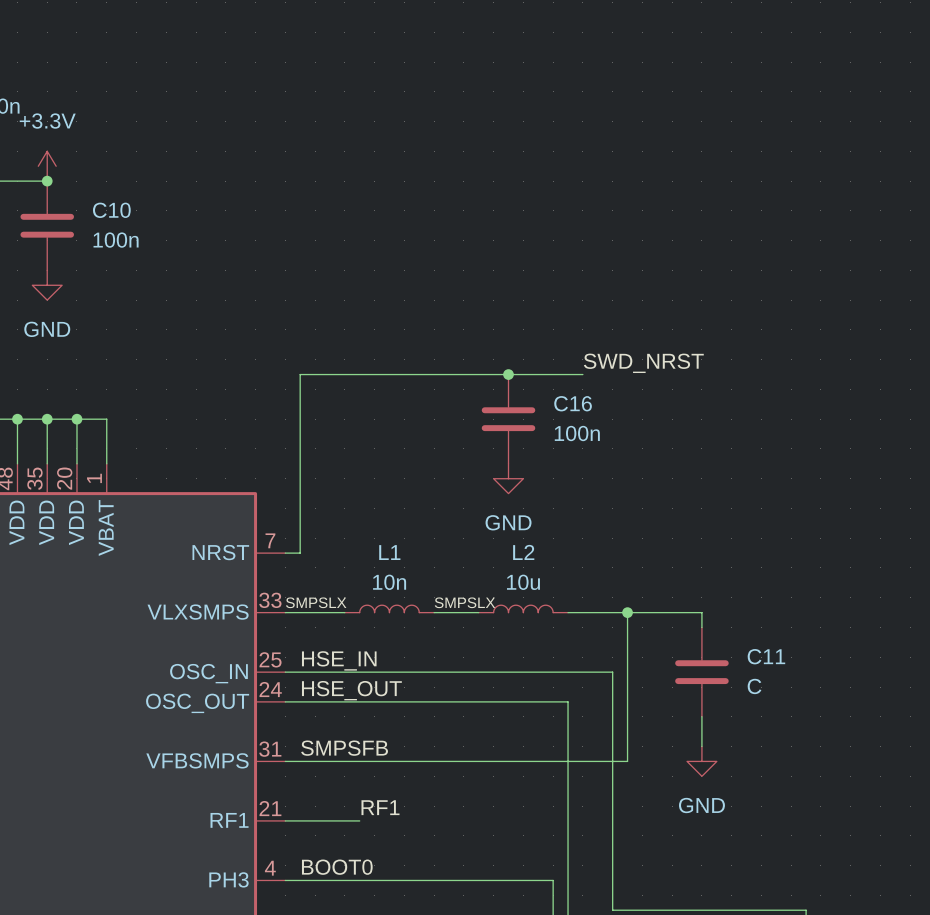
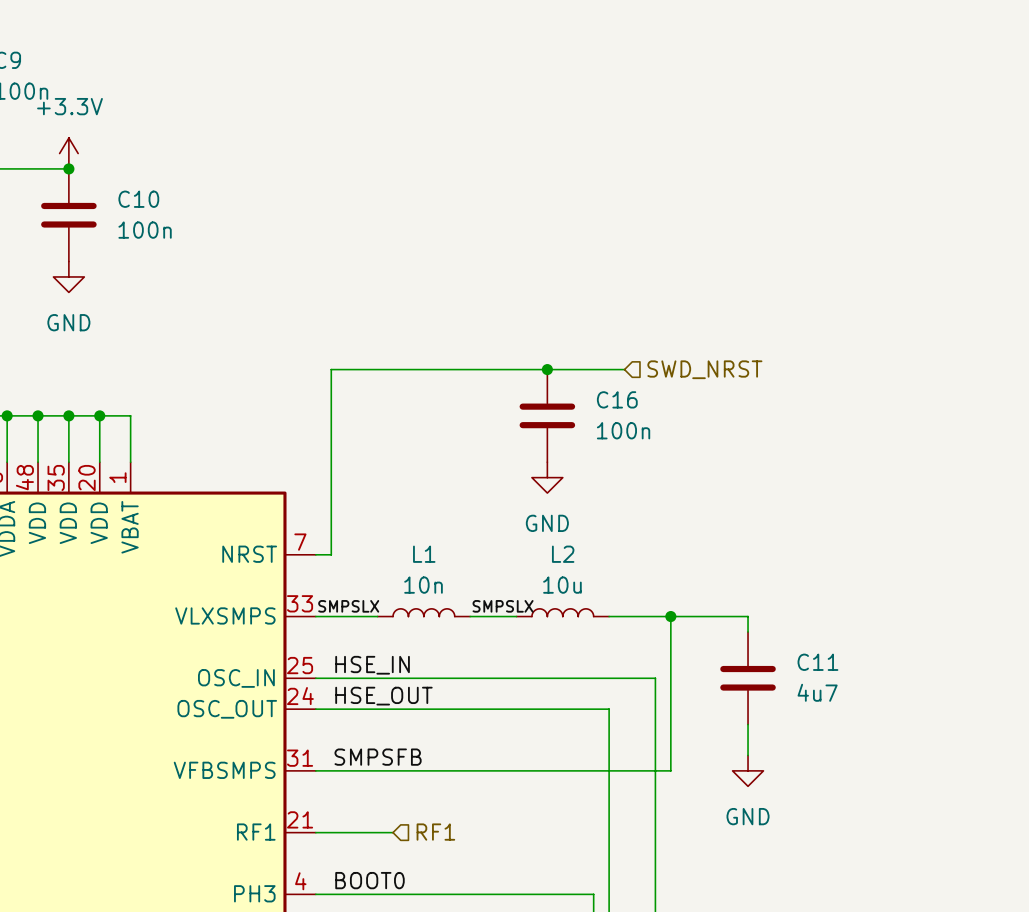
label: SWD_NRST (643, 363) -> none
hierarchical label: none -> SWD_NRST (704, 369)
C11 value: C (754, 686) -> 4u7 (817, 692)
label: RF1 (380, 807) -> none
hierarchical label: none -> RF1 (435, 832)

